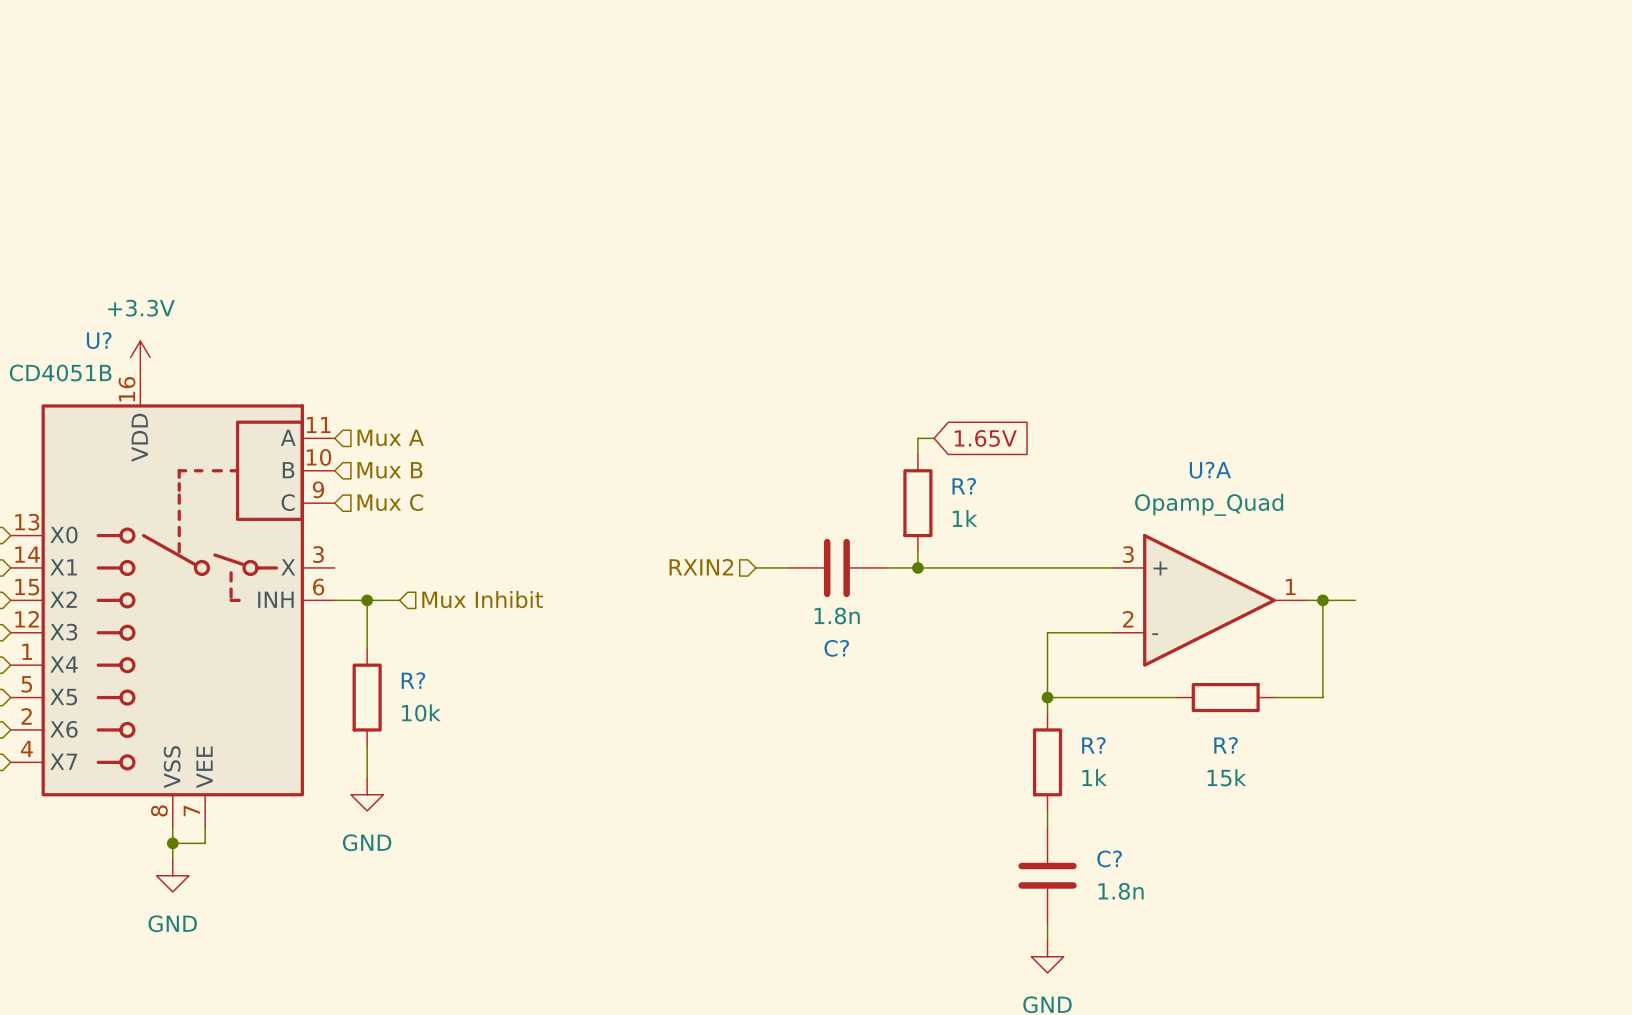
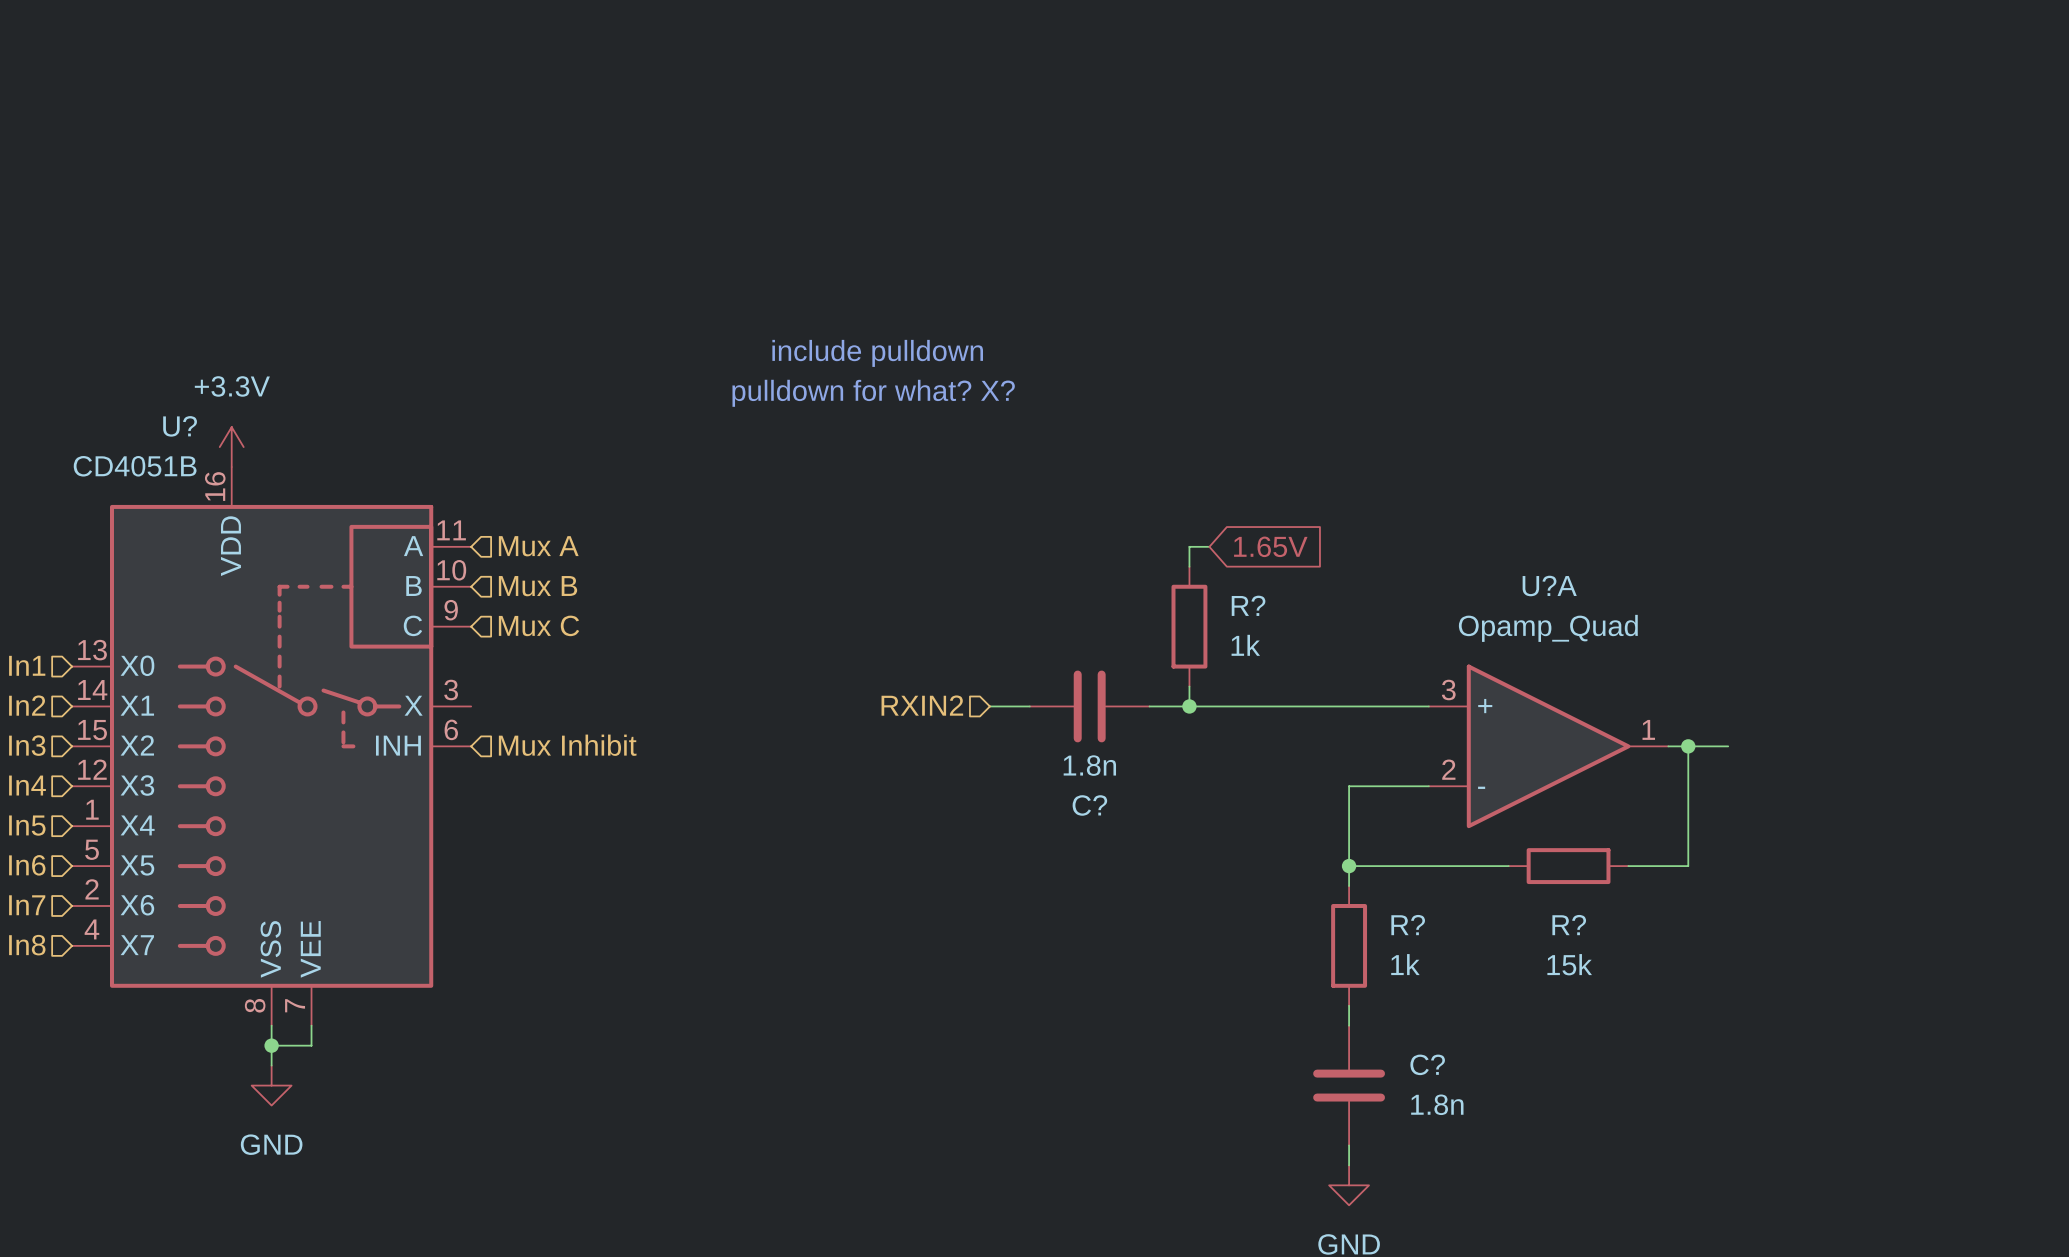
text: none -> include pulldown (877, 353)
text: none -> pulldown for what? X? (873, 393)
hierarchical label position: Mux Inhibit (482, 599) -> Mux Inhibit (567, 745)
wire: (334, 600) (399, 600) -> none
wire: (367, 600) (367, 648) -> none
junction: (367, 600) -> none
R?: 10k (367, 697) -> none
wire: (367, 746) (367, 778) -> none
power symbol: GND (367, 794) -> none

